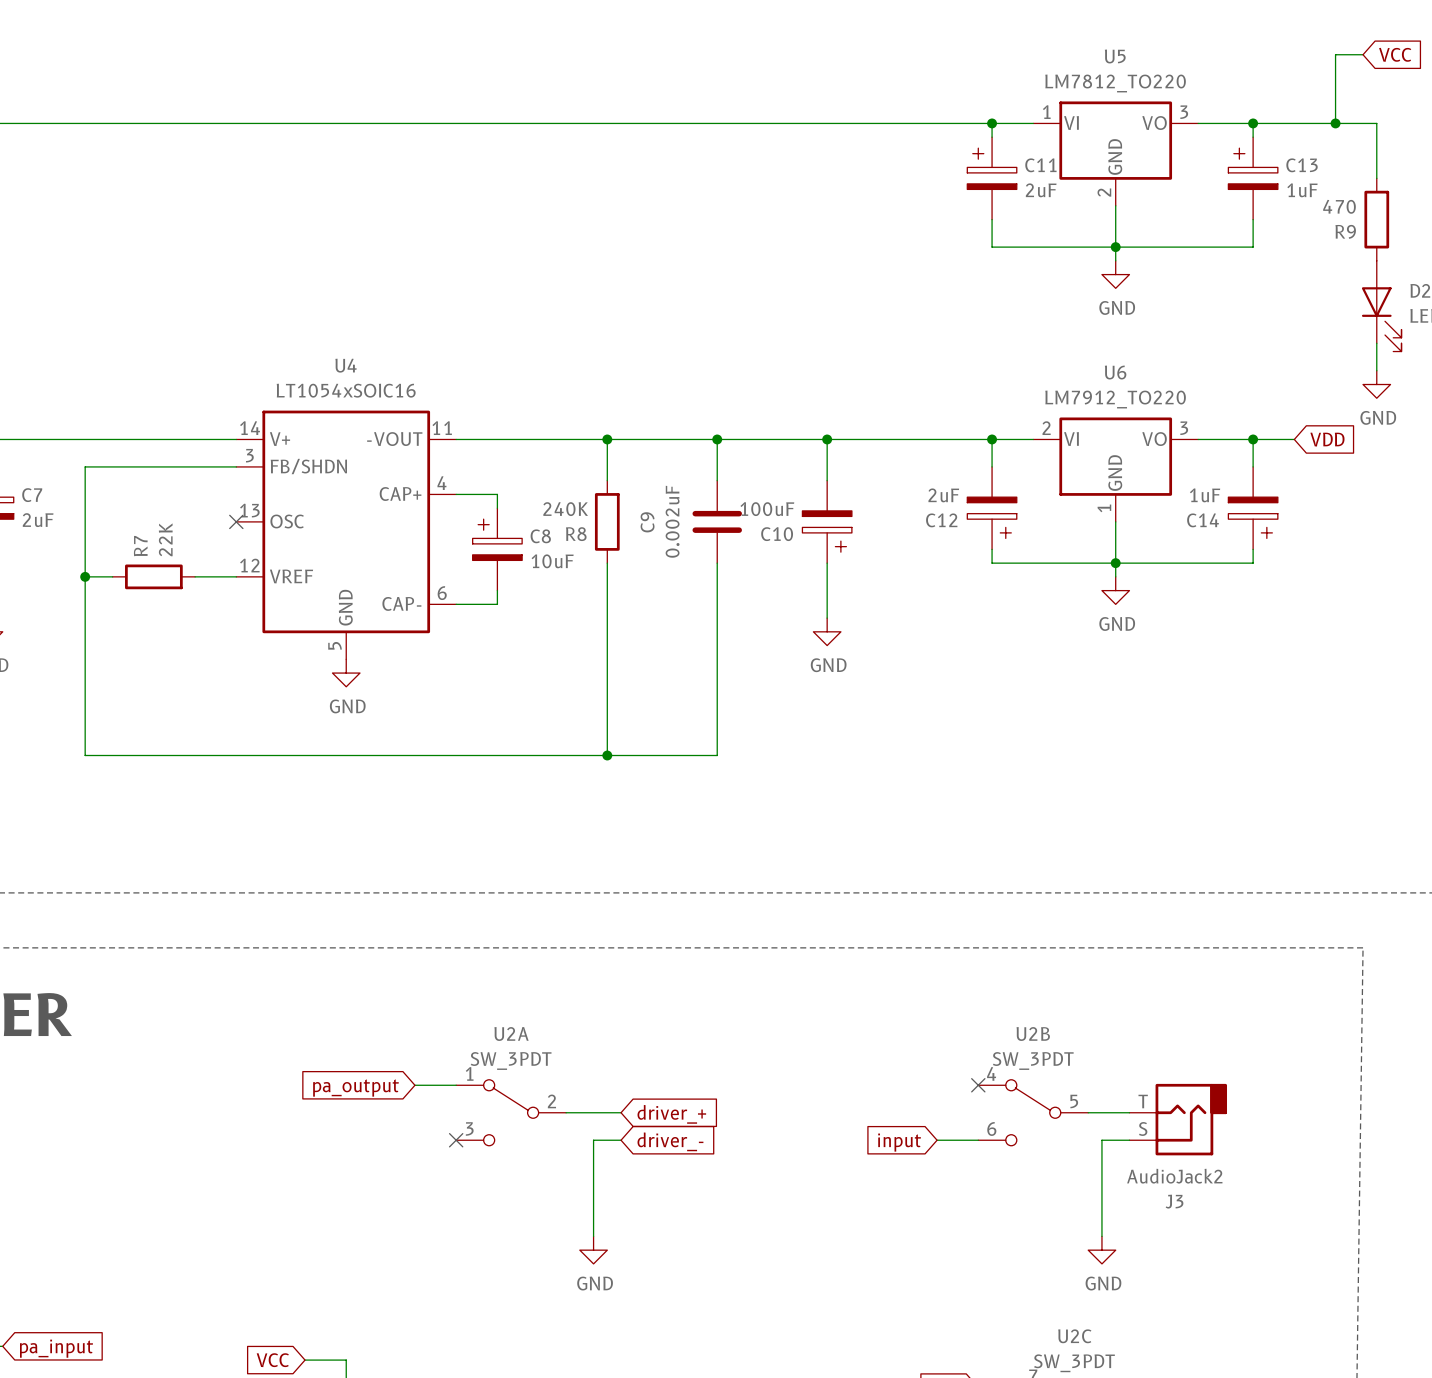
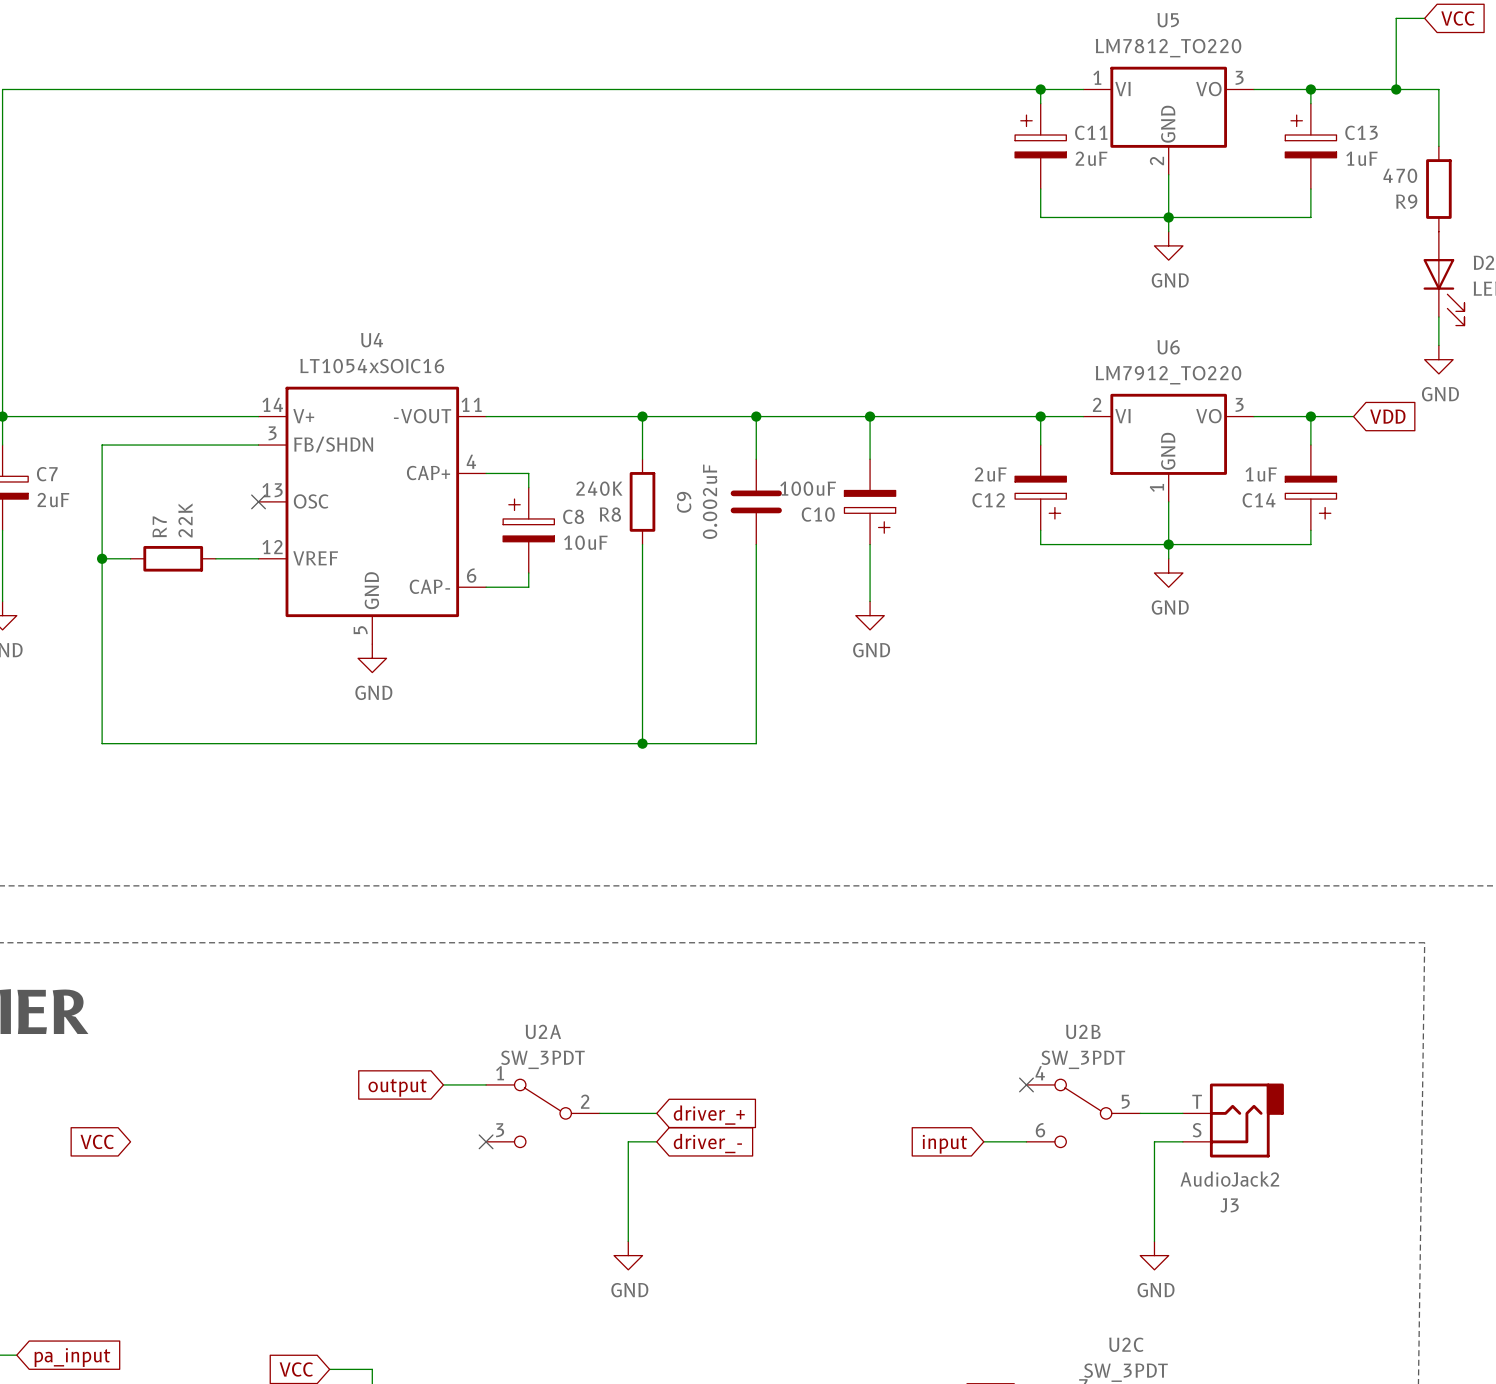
global label: pa_output (355, 1087) -> output (397, 1087)
global label: none -> VCC (97, 1141)

